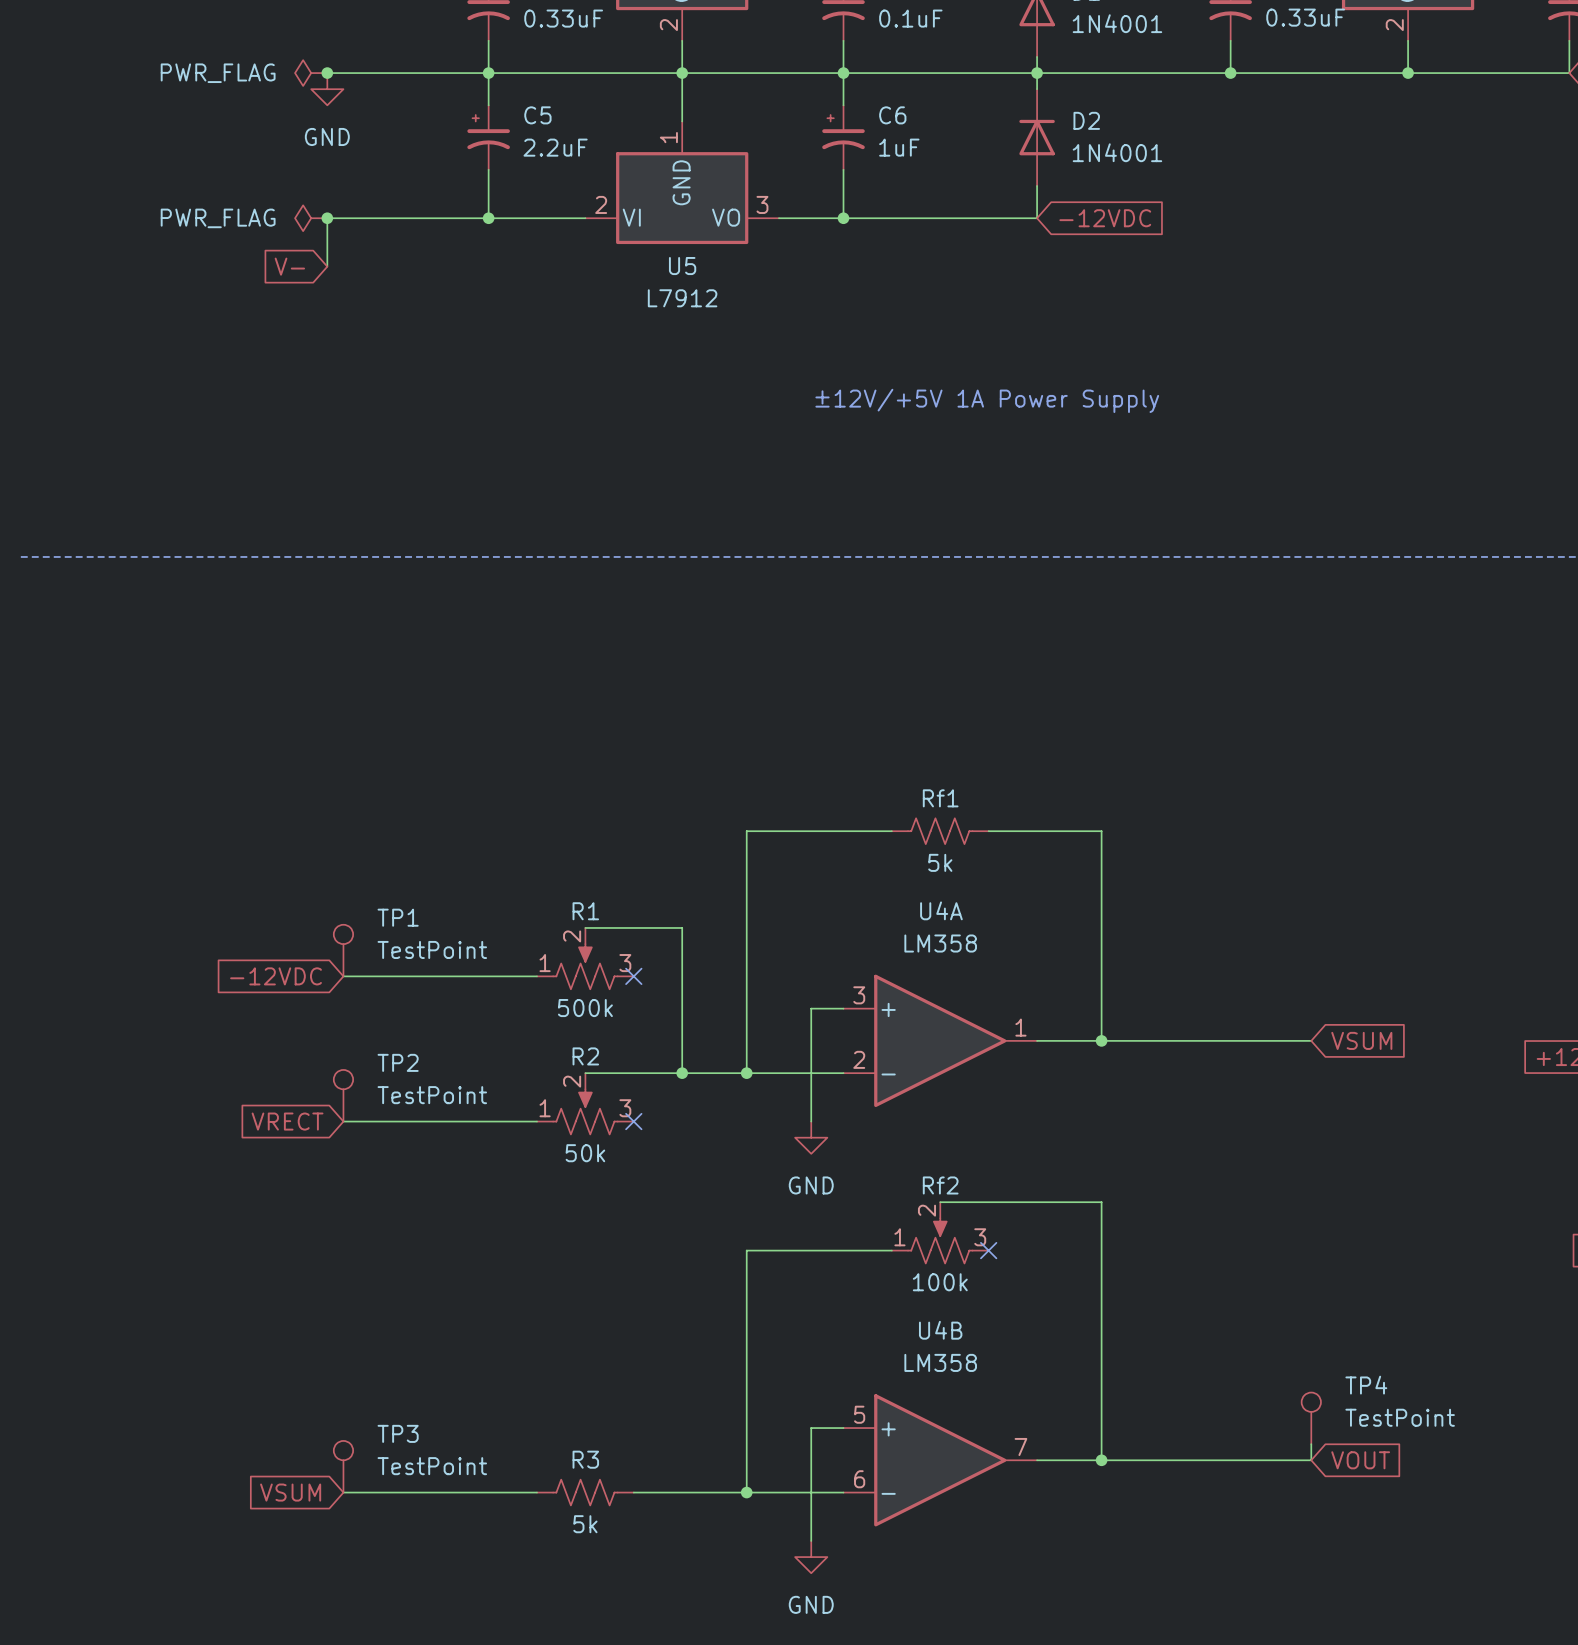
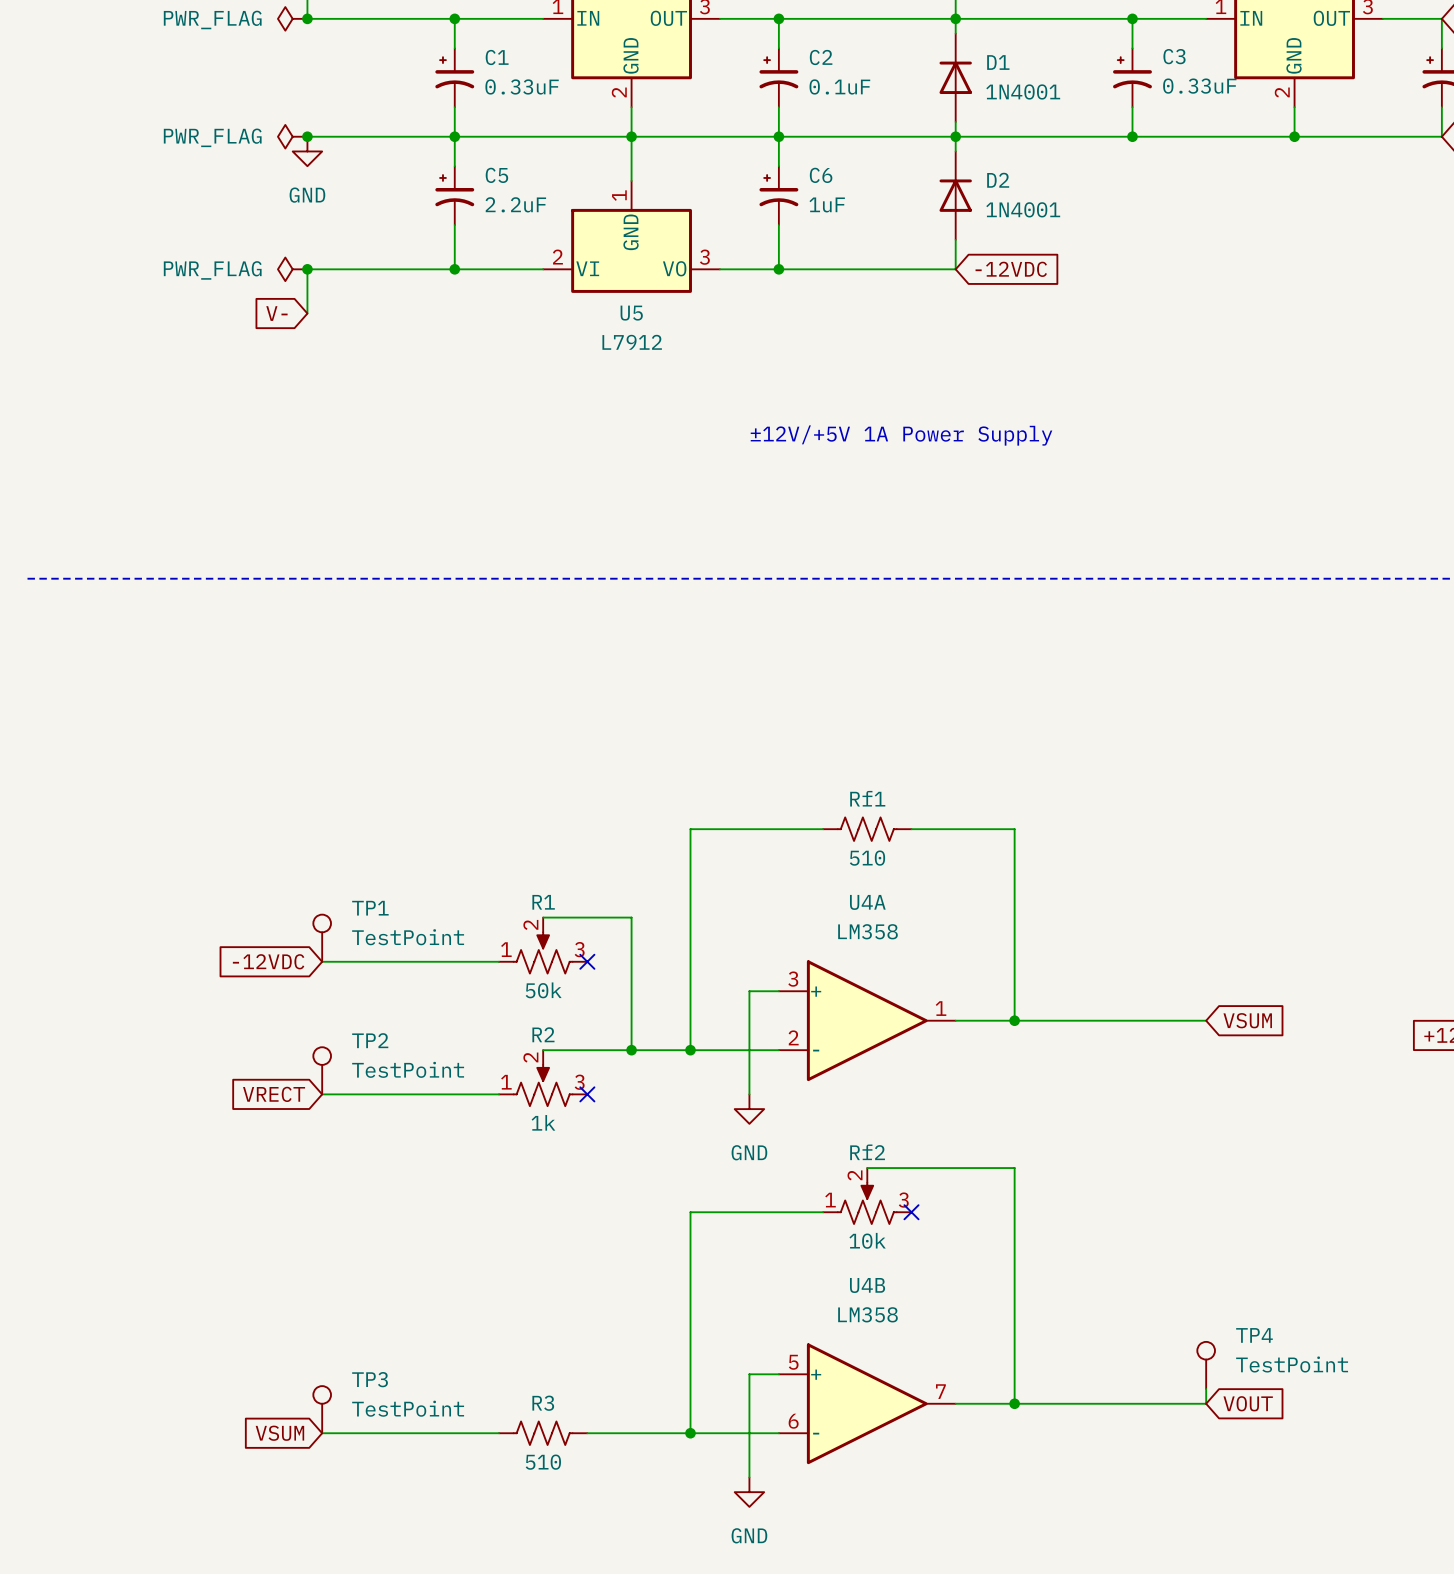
Rf1 value: 5k (940, 862) -> 510 (867, 858)
R1 value: 500k (585, 1008) -> 50k (543, 990)
R2 value: 50k (585, 1153) -> 1k (543, 1122)
Rf2 value: 100k (940, 1282) -> 10k (867, 1240)
R3 value: 5k (585, 1524) -> 510 (543, 1462)

